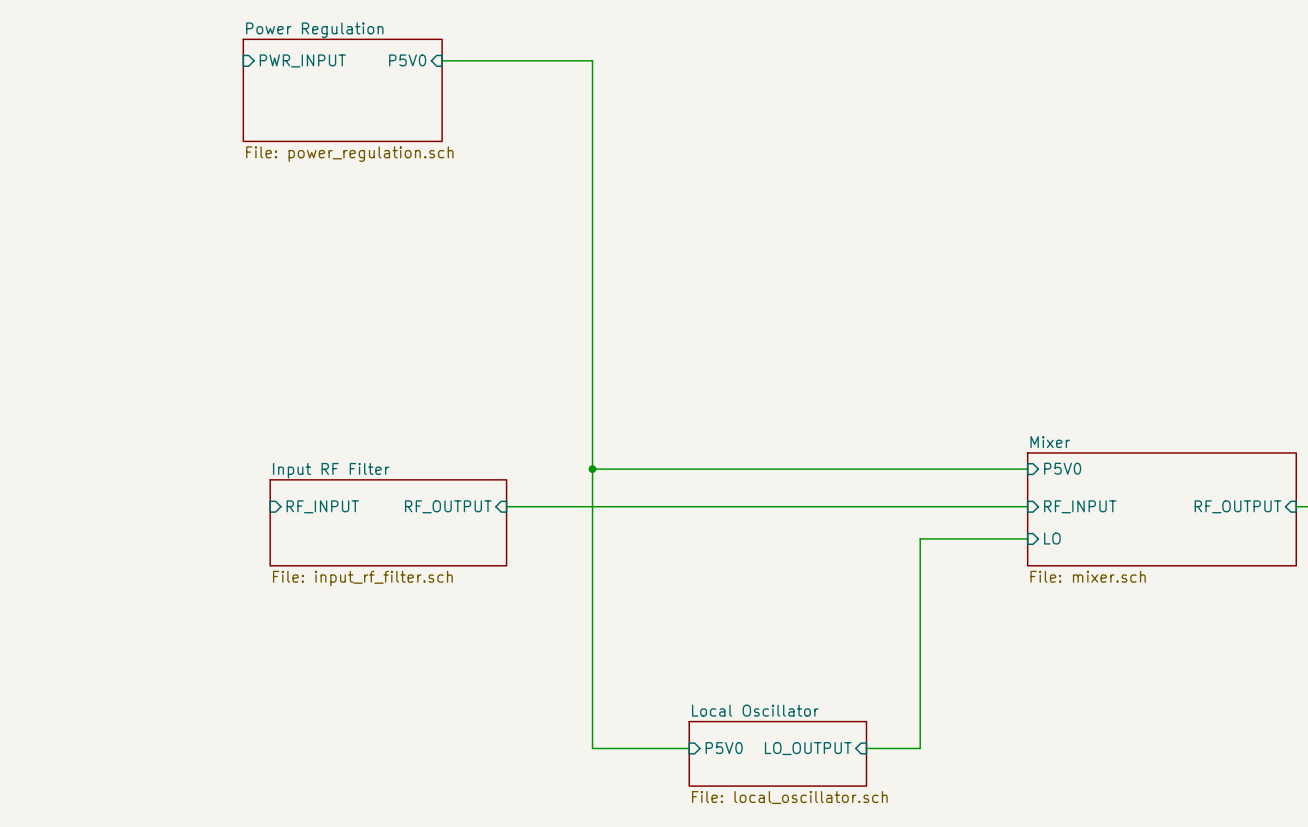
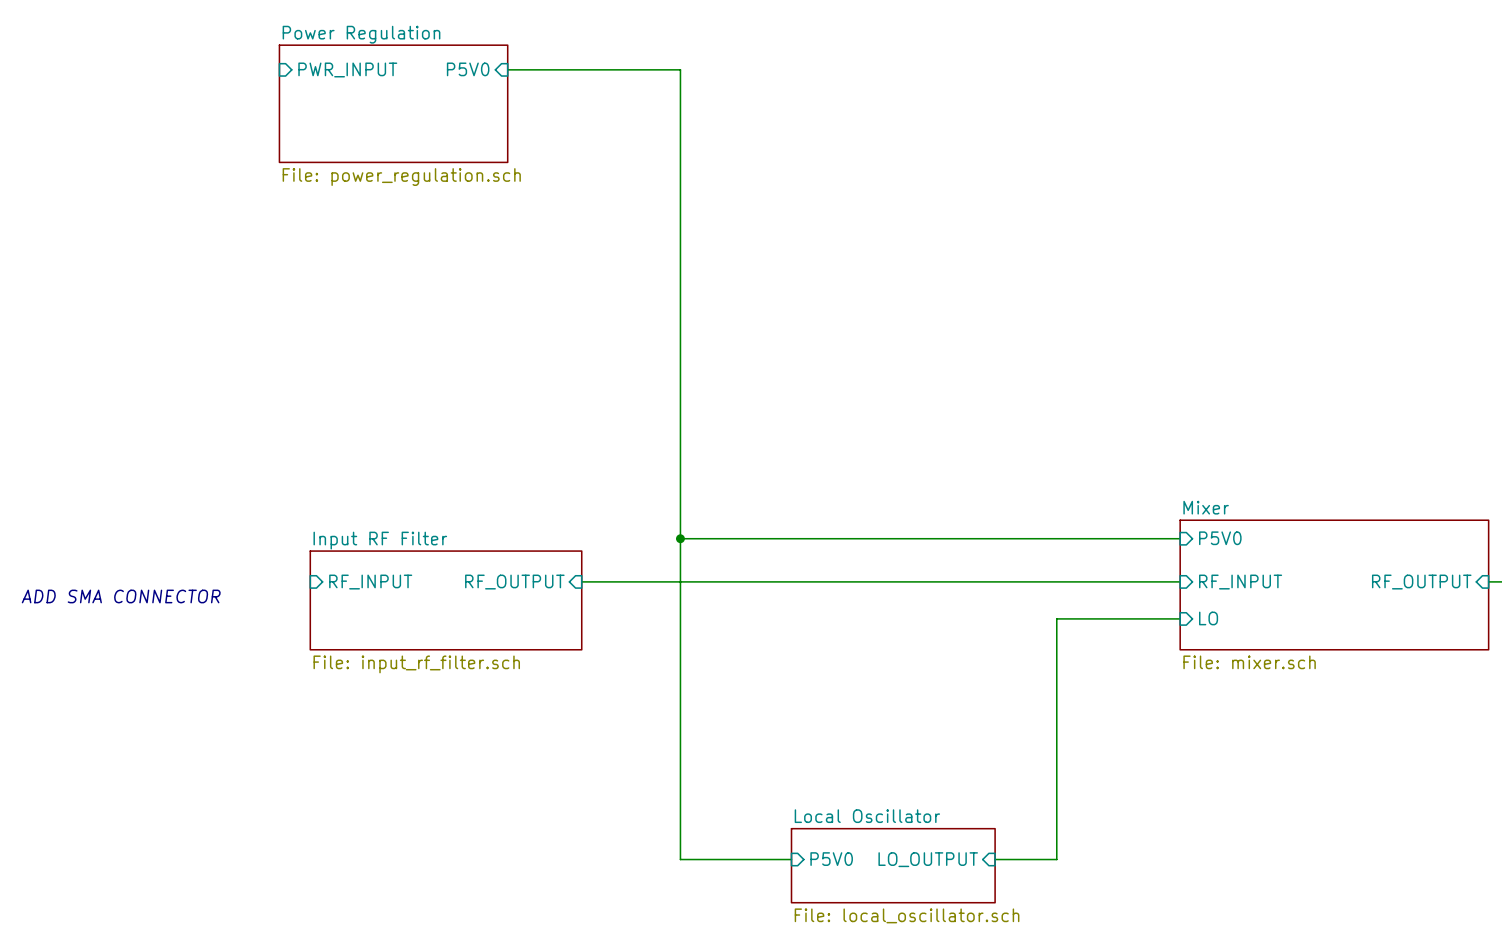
text: none -> ADD SMA CONNECTOR (121, 596)

